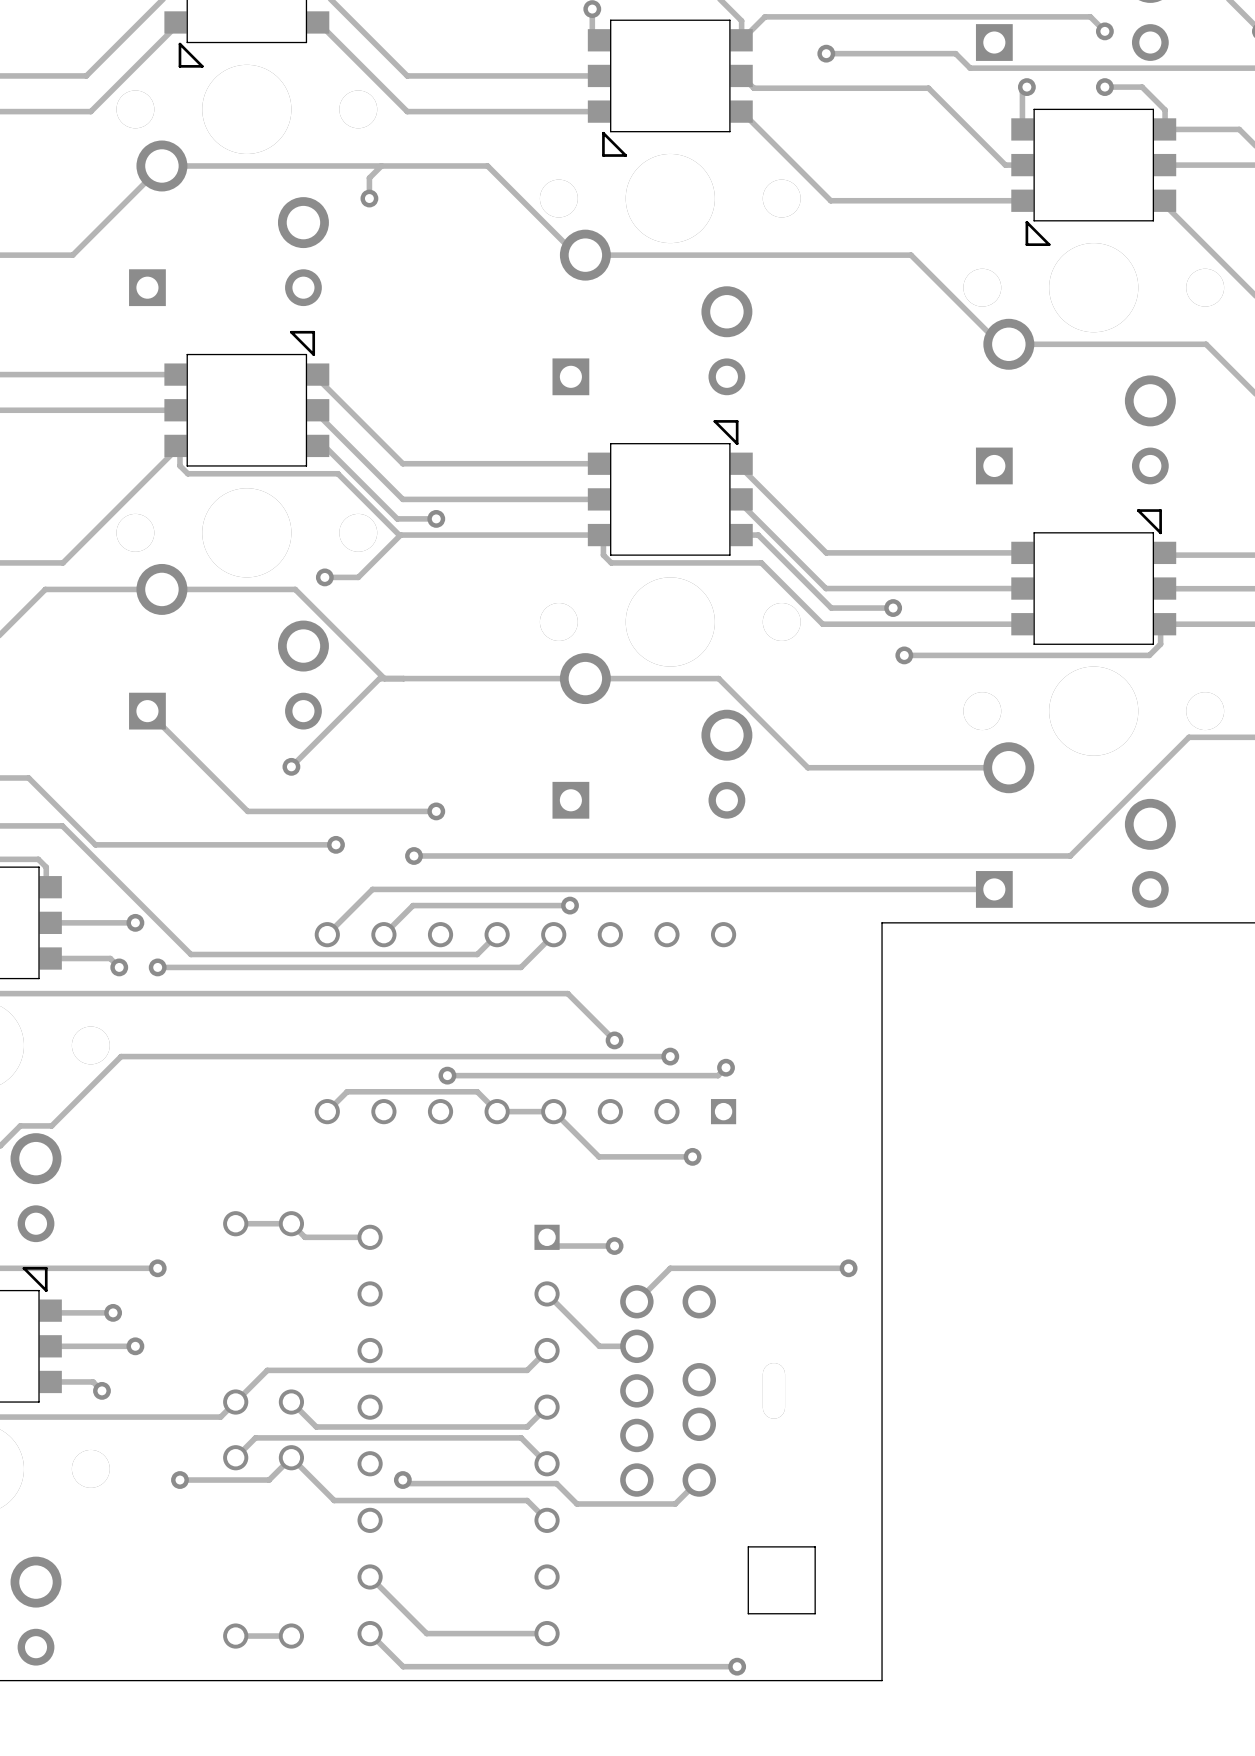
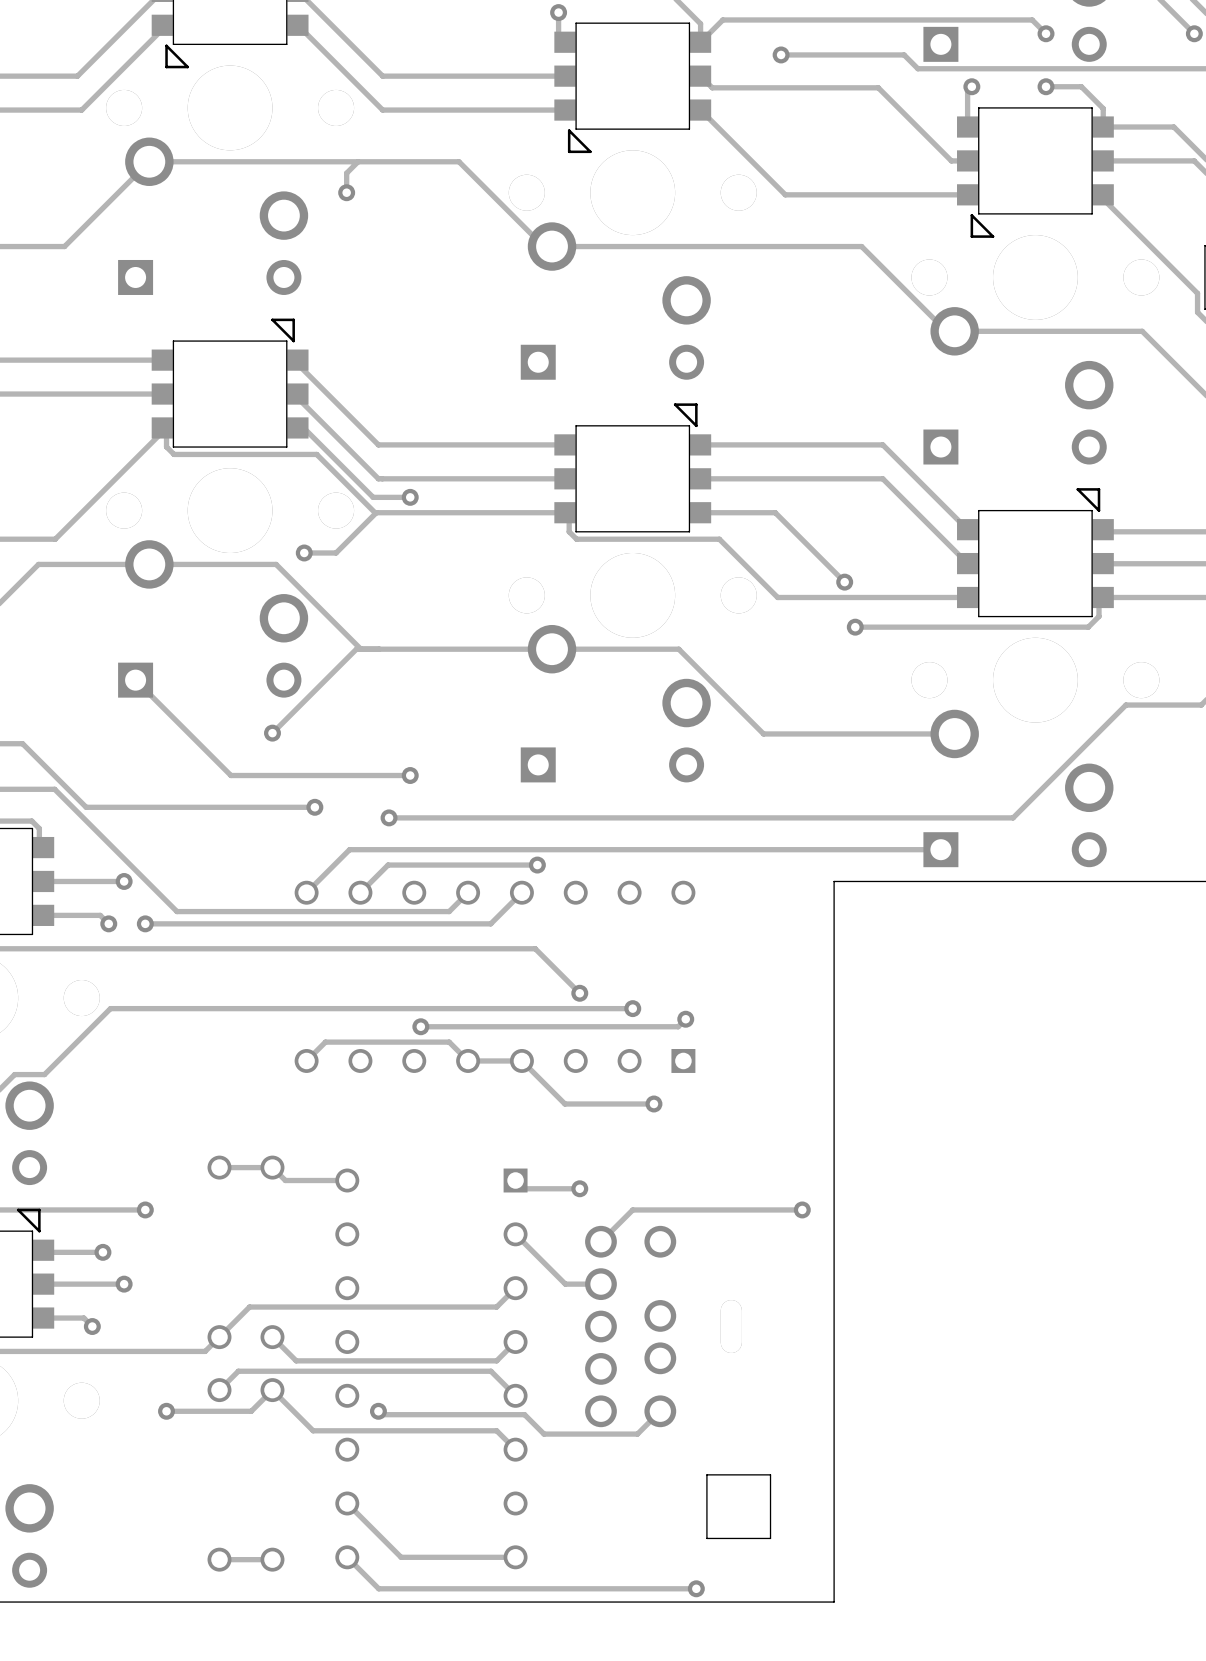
track: (737, 463) (826, 552) (1026, 552) -> none
track: none -> (700, 444) (882, 444) (967, 529)
track: (737, 499) (825, 588) (1026, 588) -> none
track: none -> (700, 478) (882, 478) (967, 563)
track: (758, 535) (831, 608) (893, 608) -> (716, 512) (775, 512) (844, 582)

